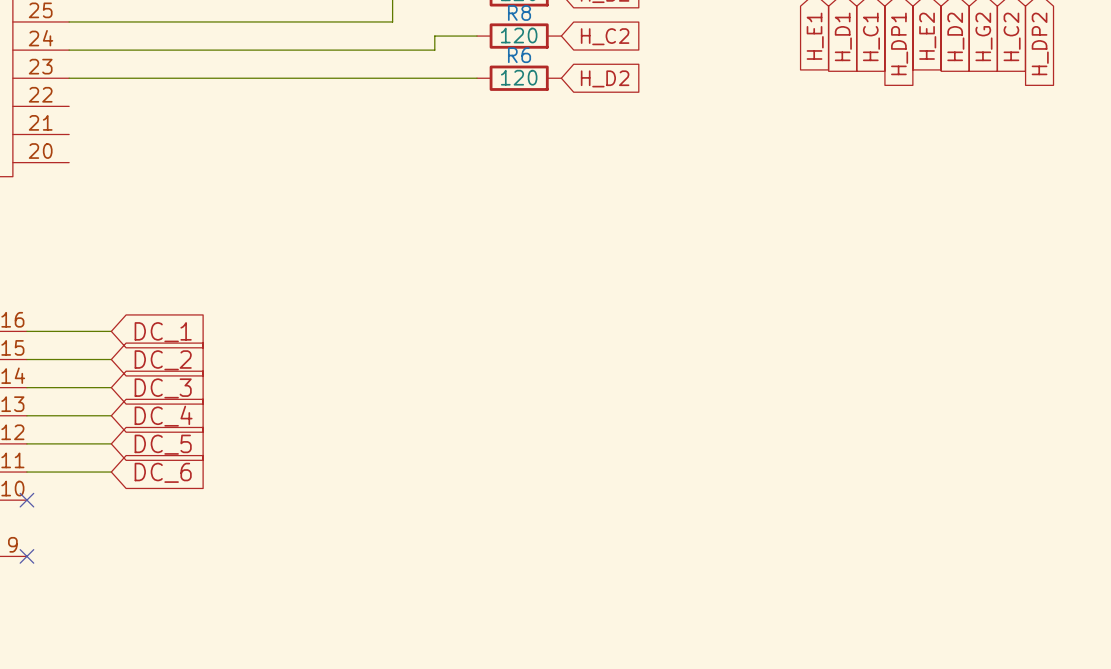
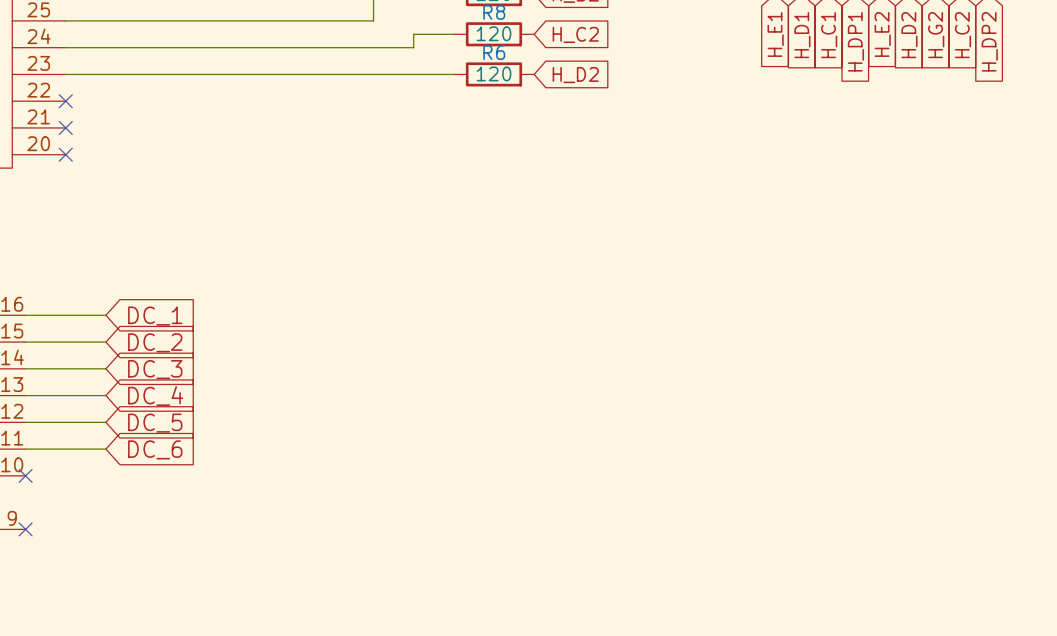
no-connect mark: none -> (65, 101)
no-connect mark: none -> (65, 127)
no-connect mark: none -> (65, 154)

